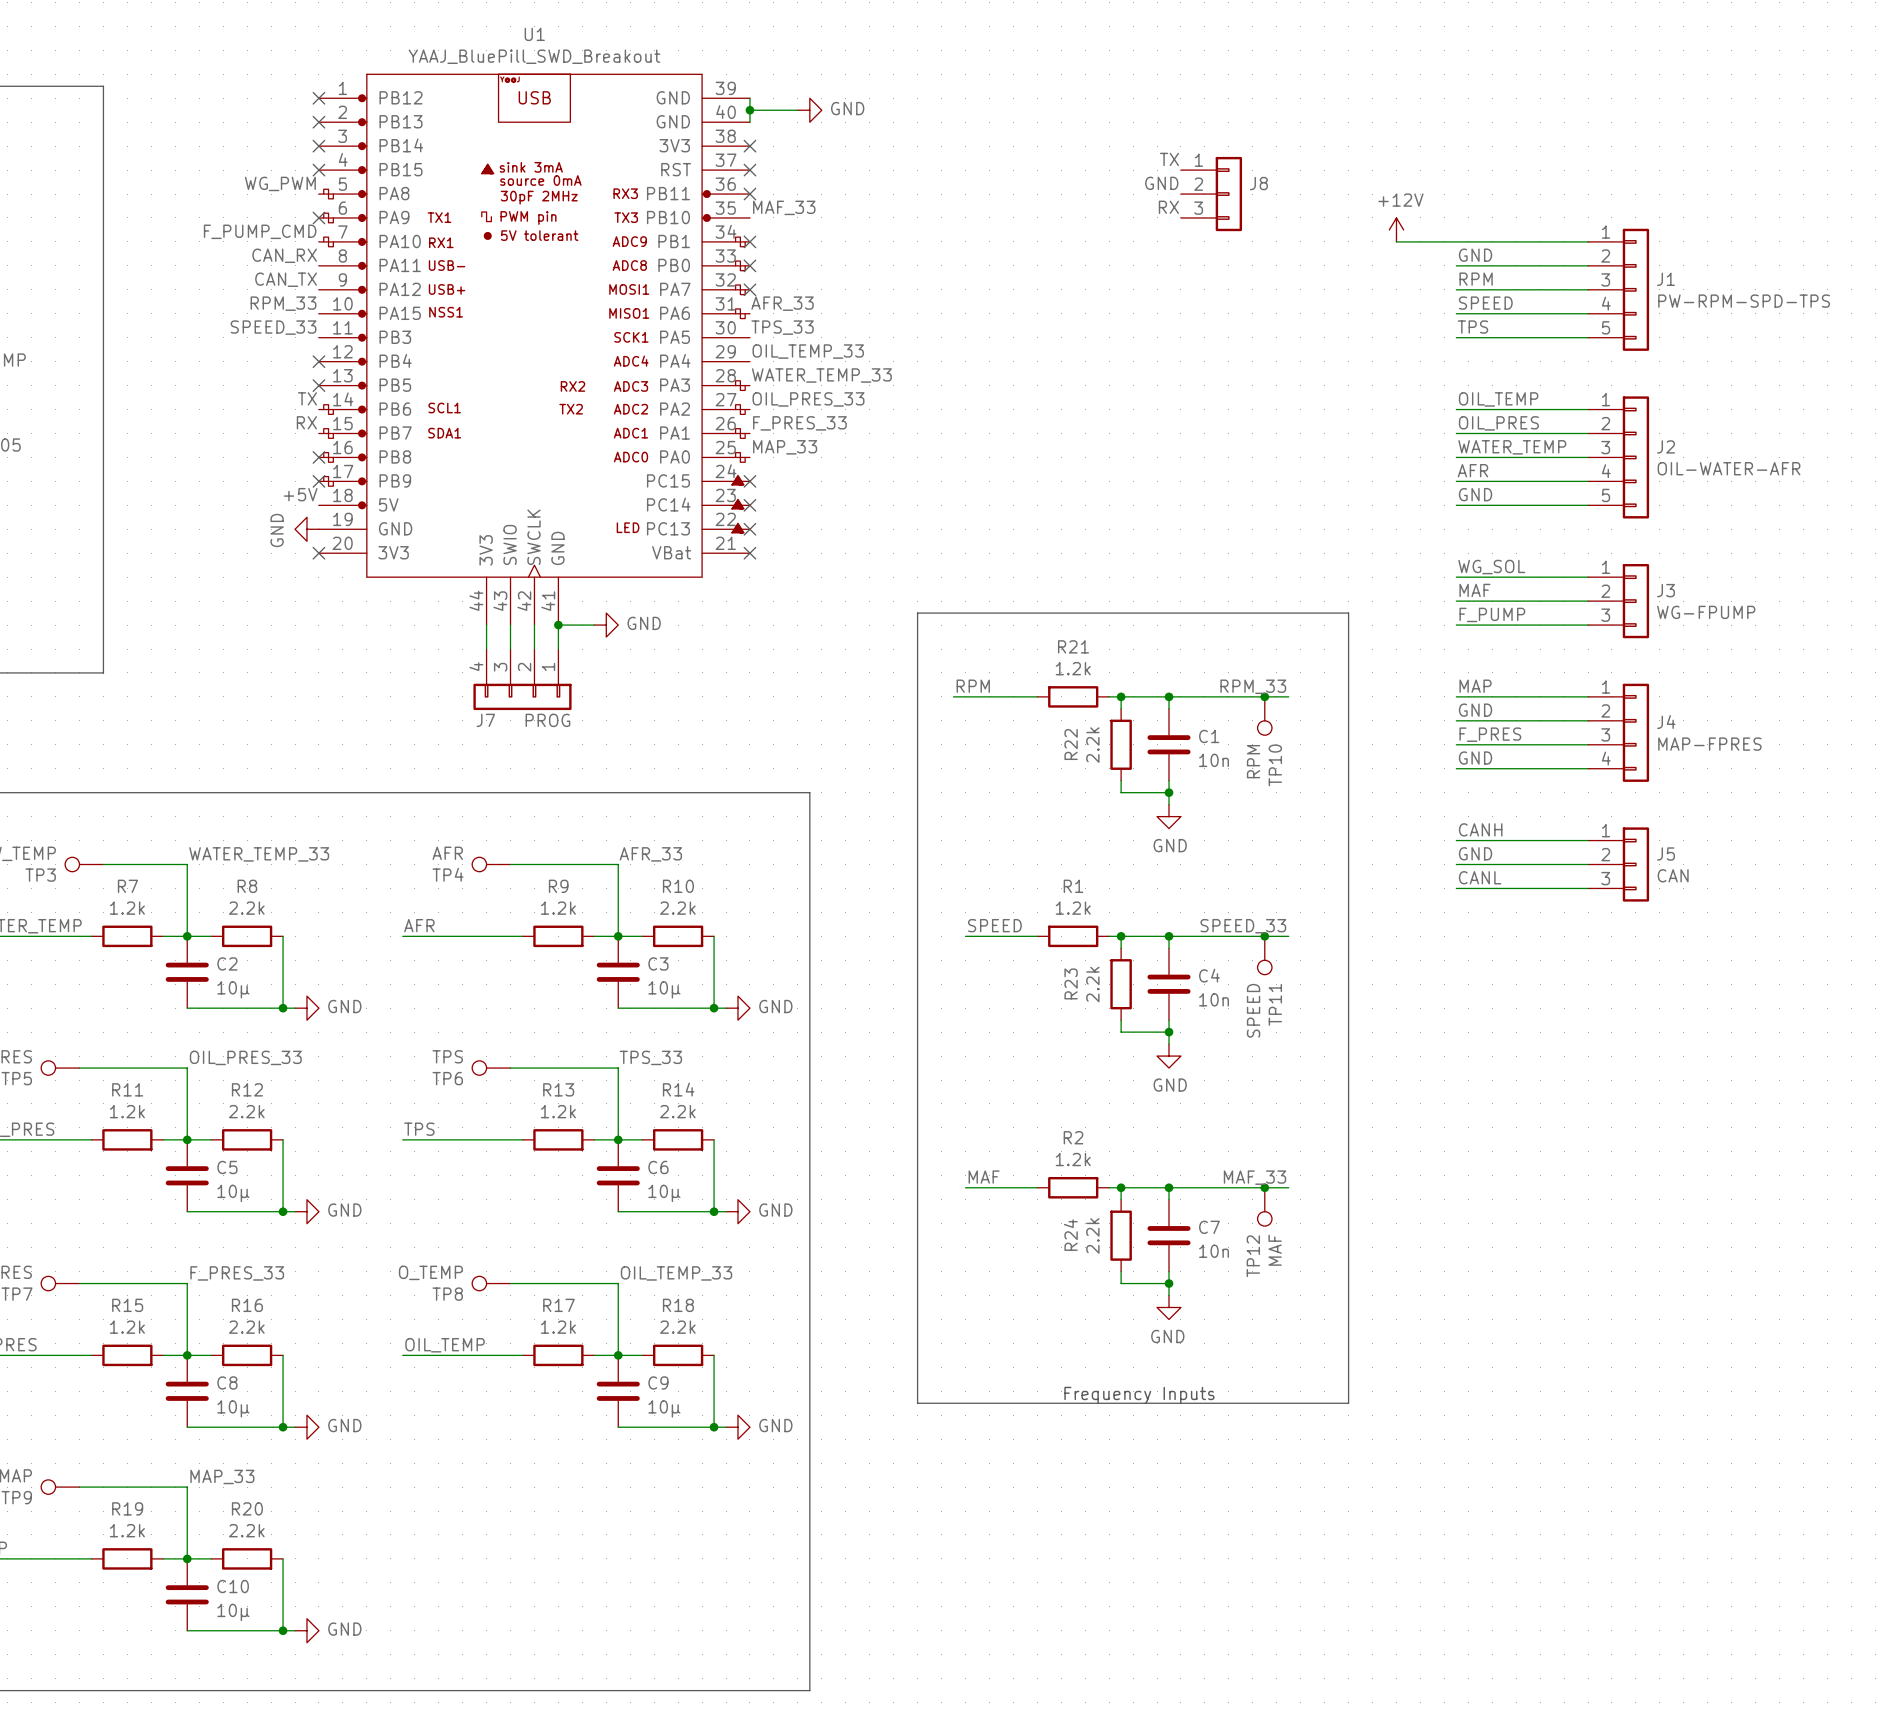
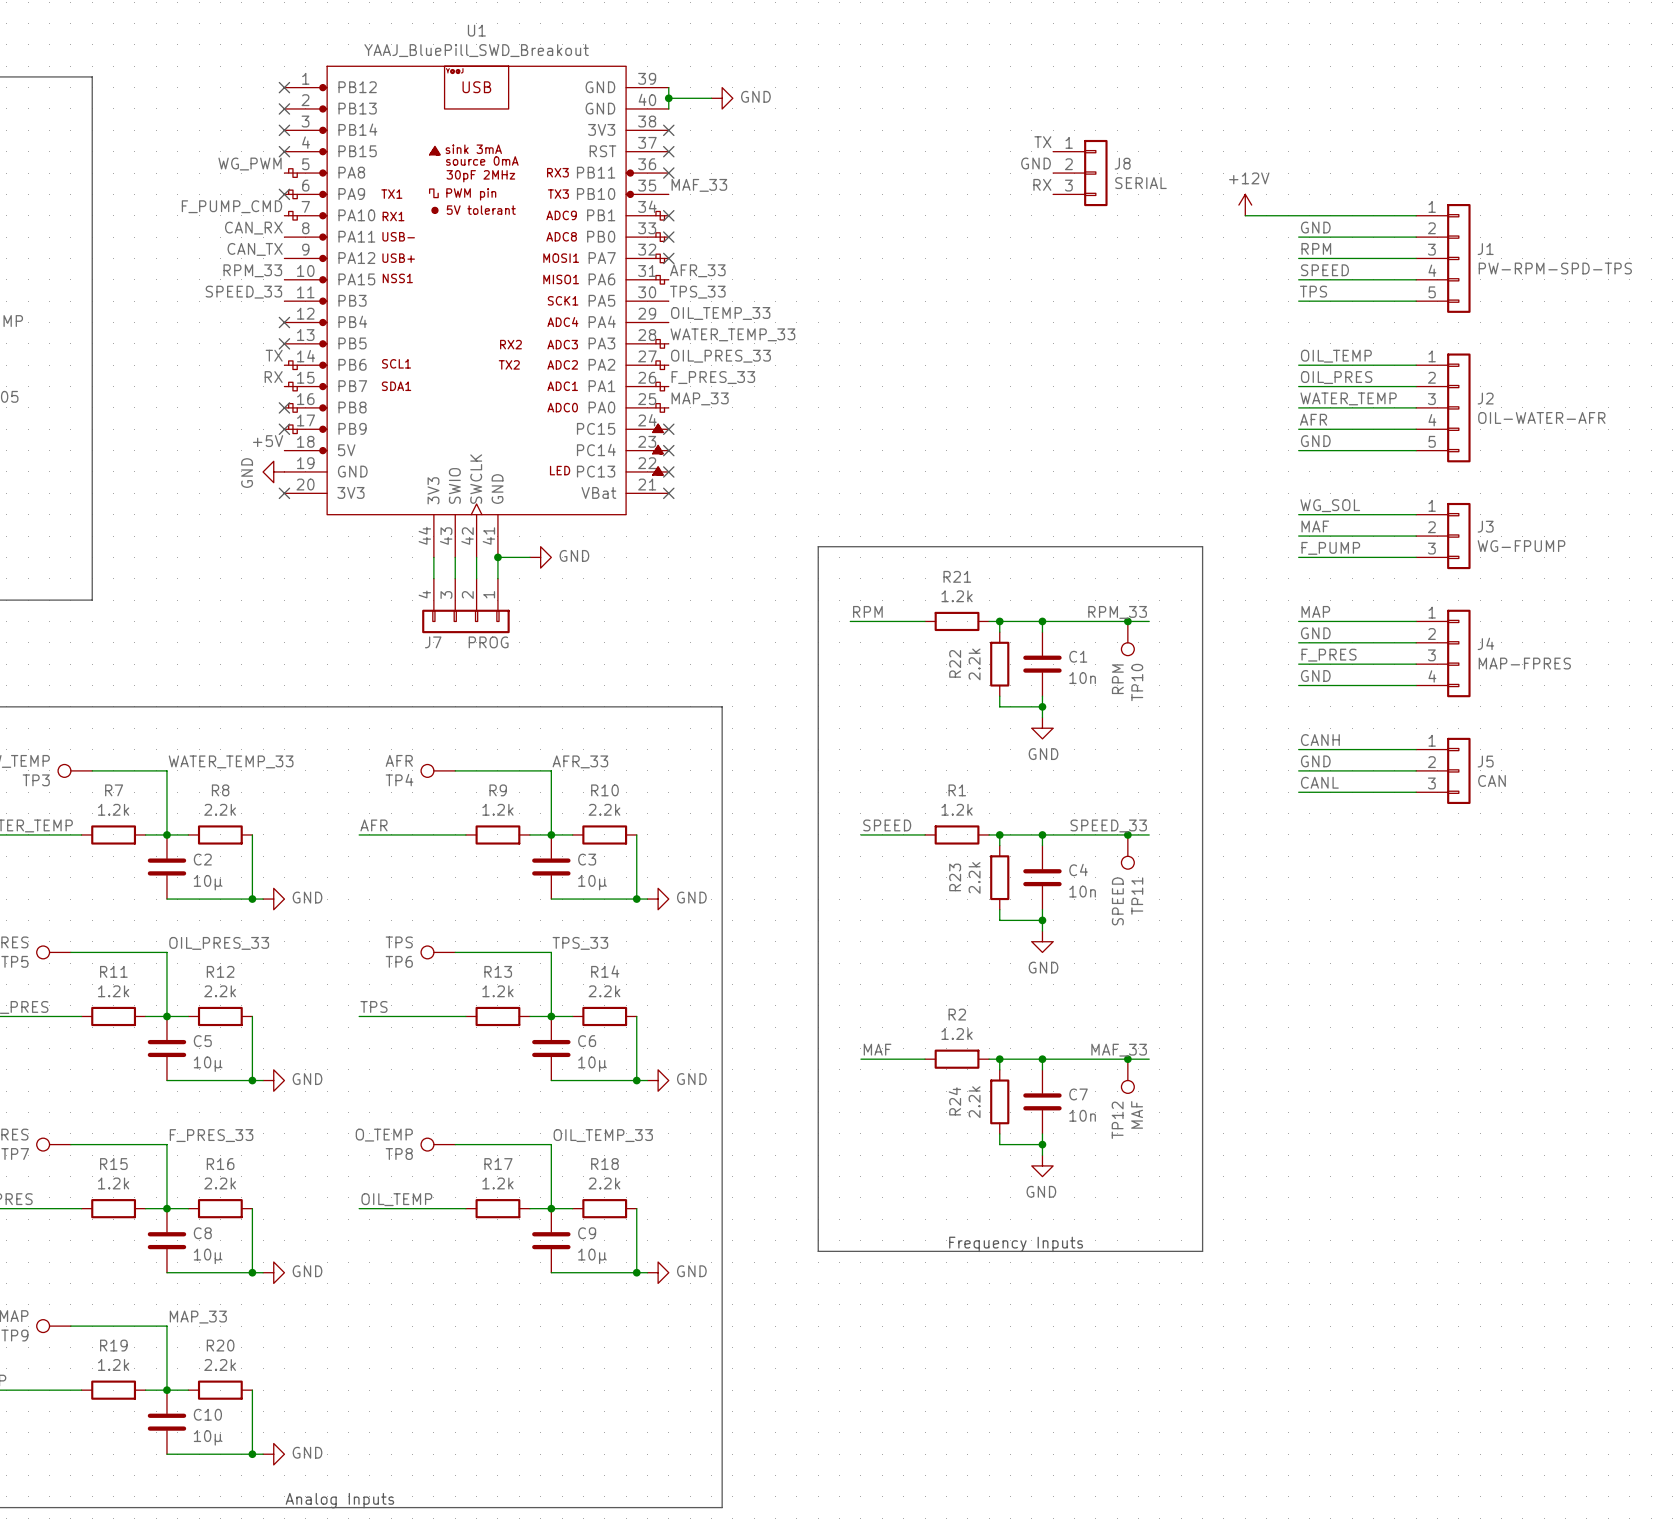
J8 value: none -> SERIAL (1140, 183)
text: none -> Analog Inputs (339, 1500)

